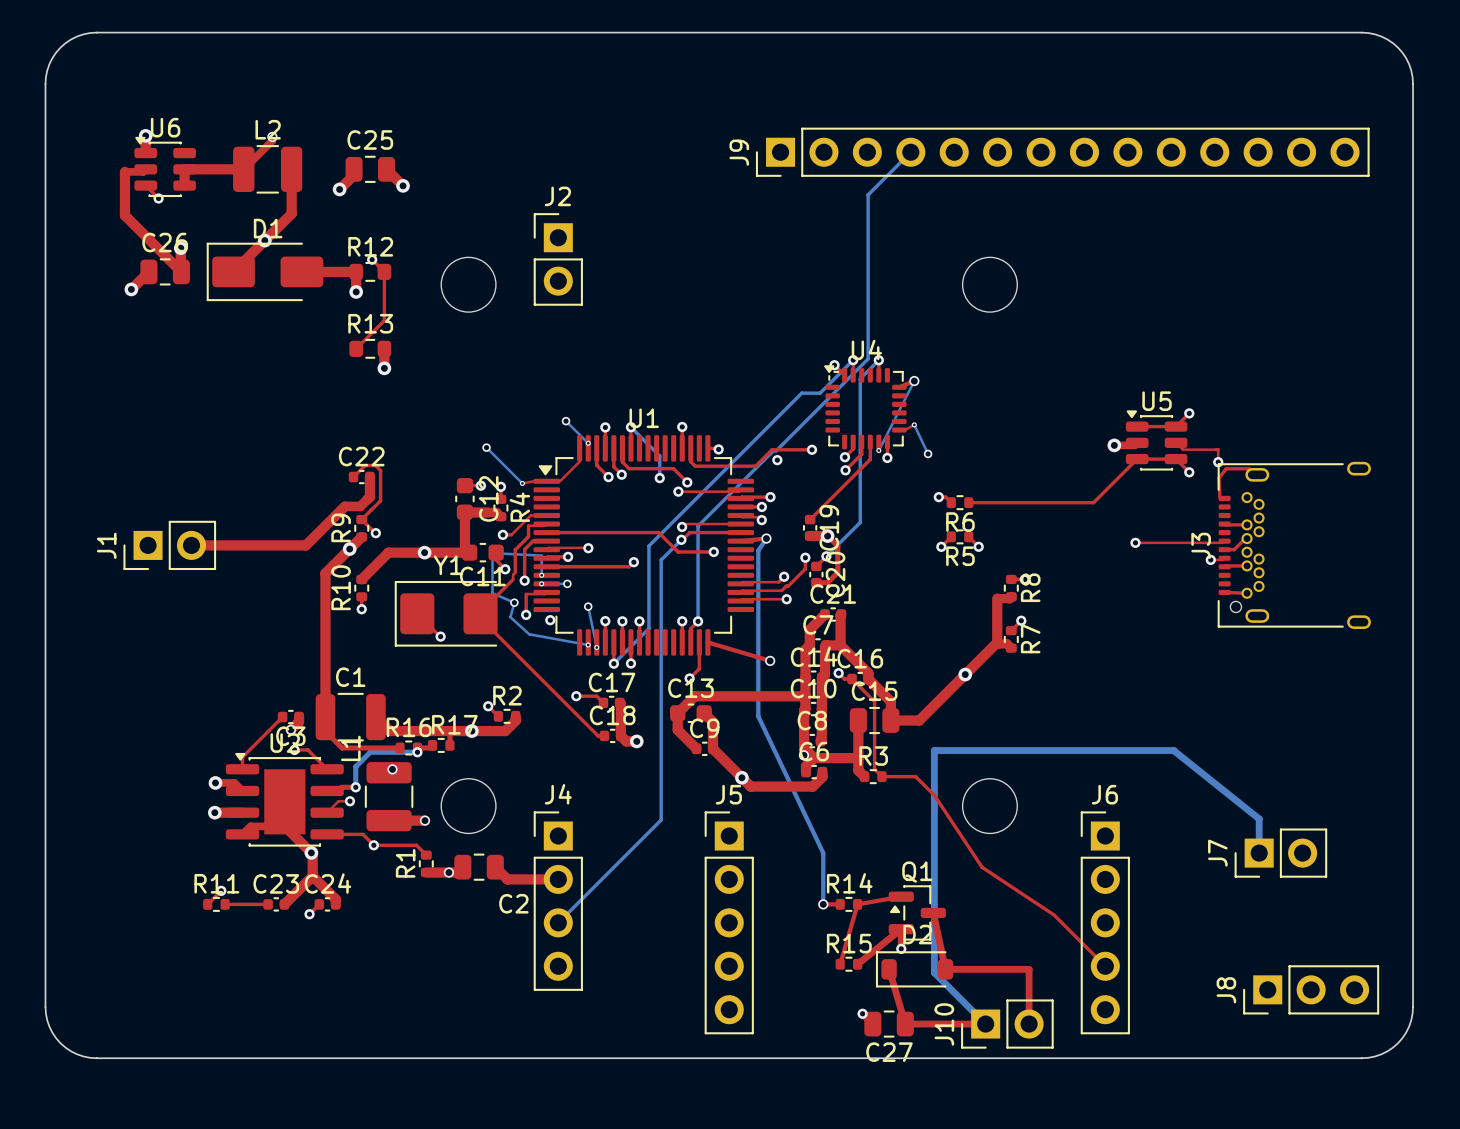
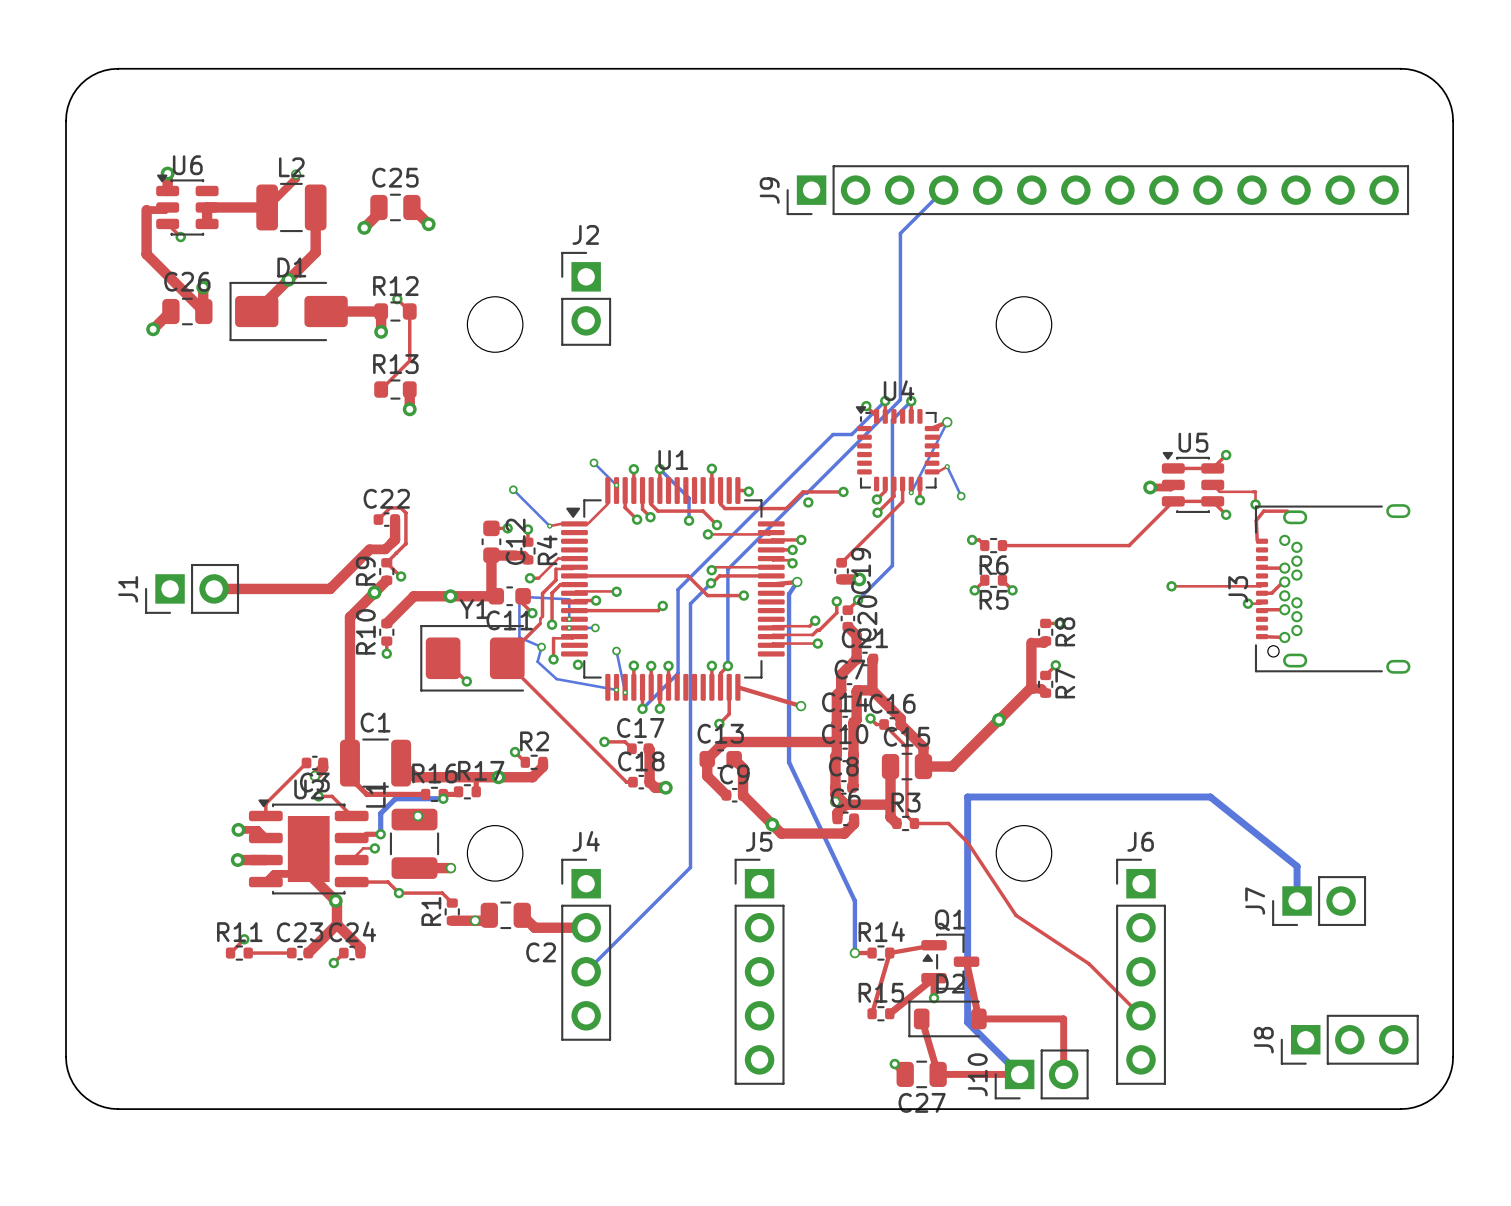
top track: (827, 536) (837, 546) (837, 572) (827, 582) (816, 582) -> (856, 659) (856, 635) (847, 626)

